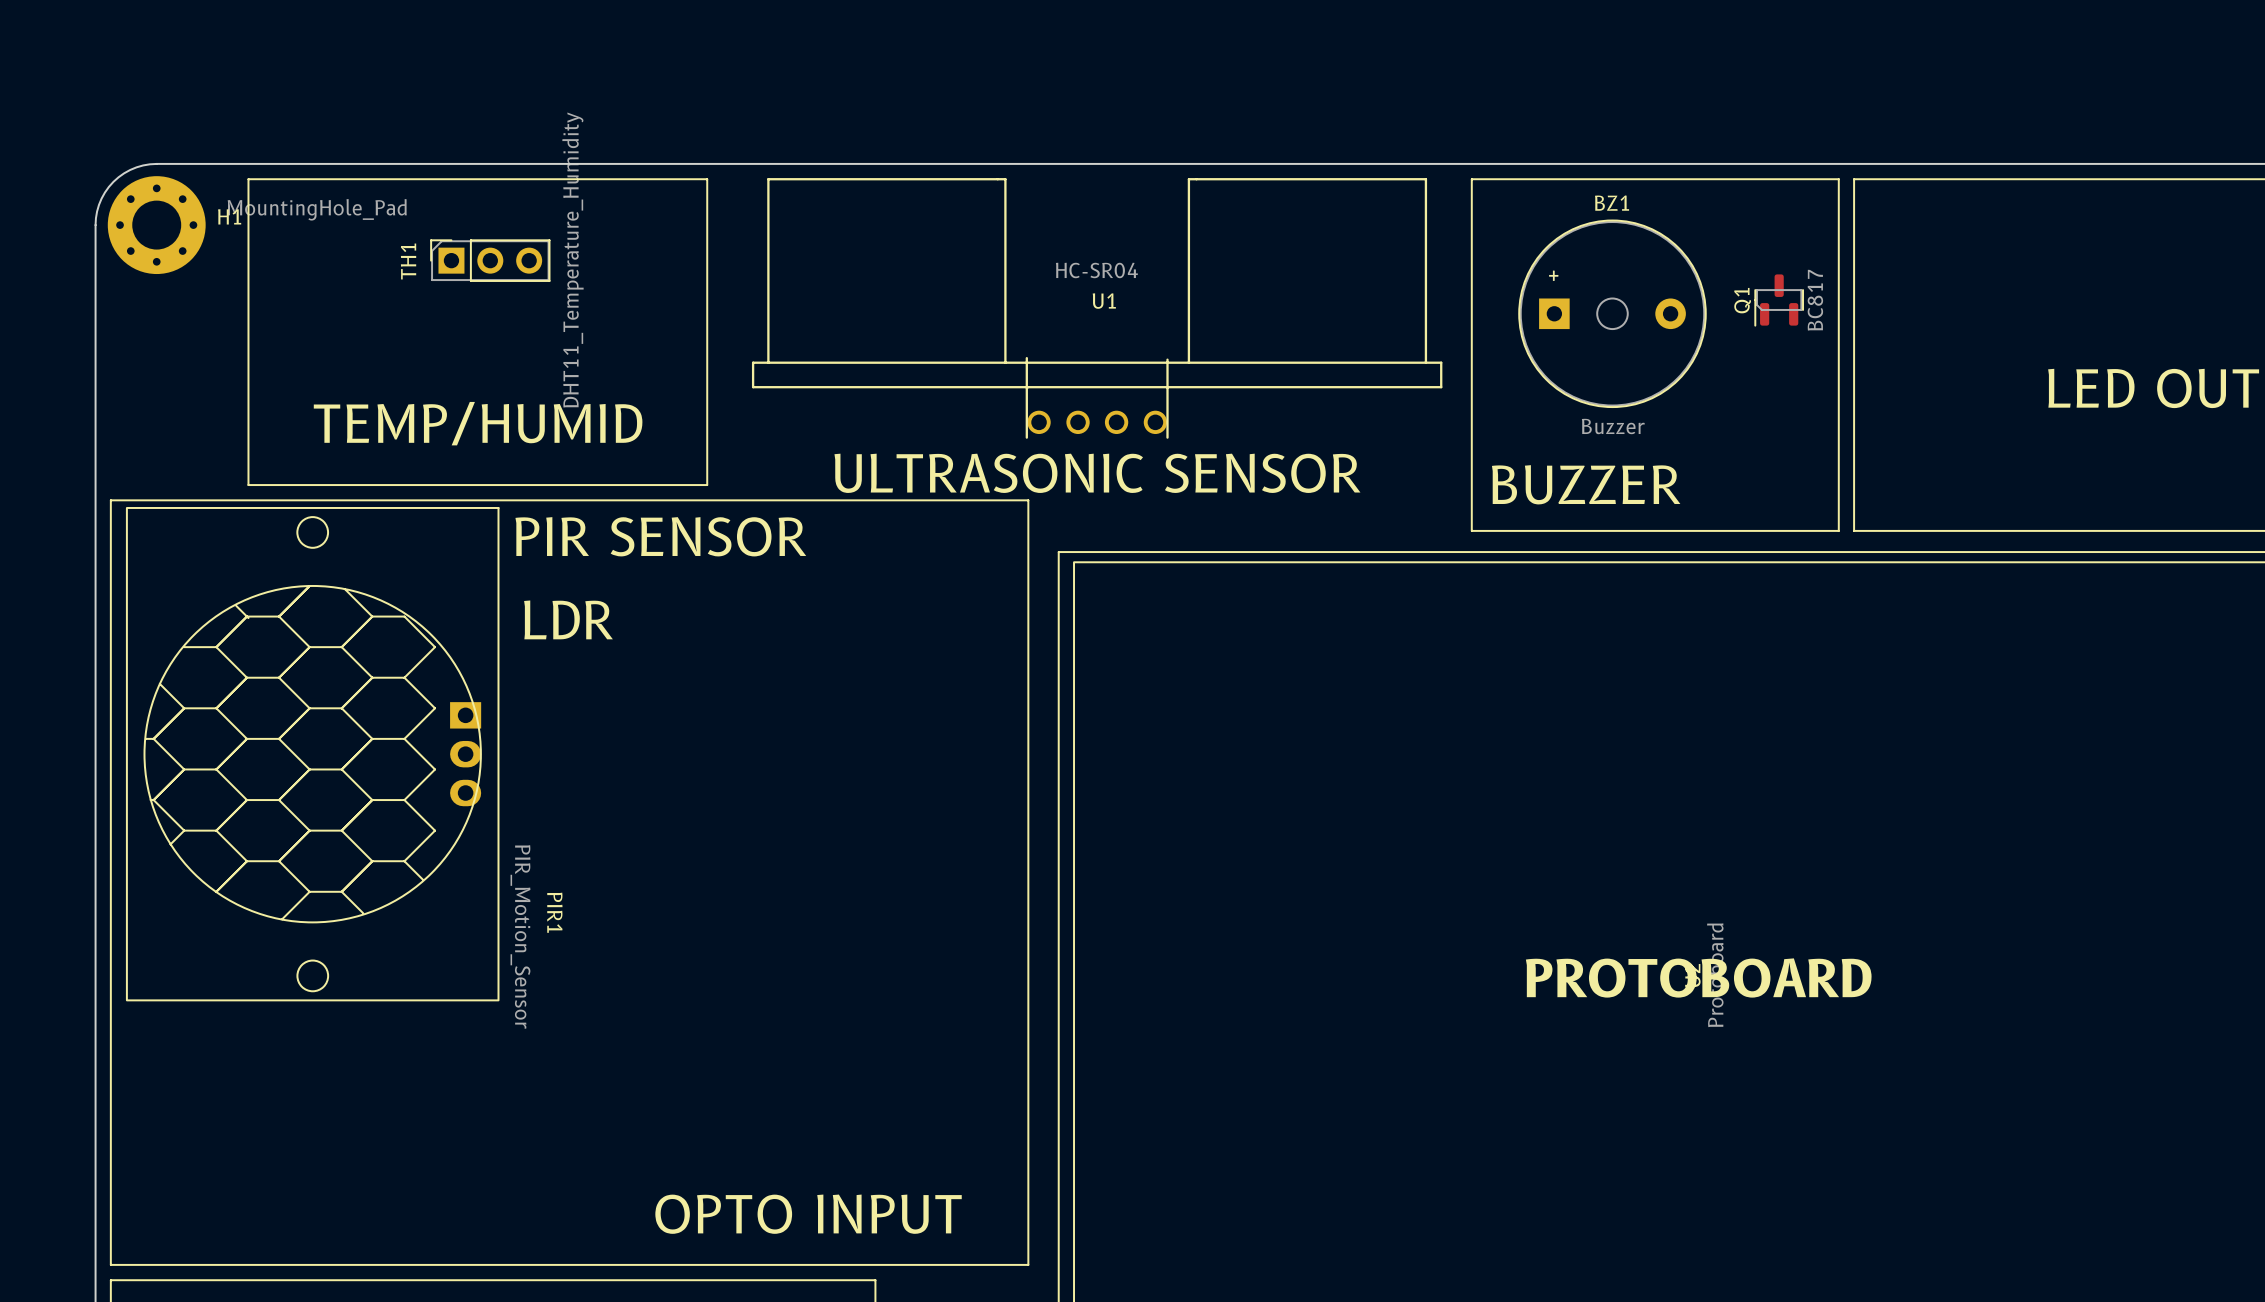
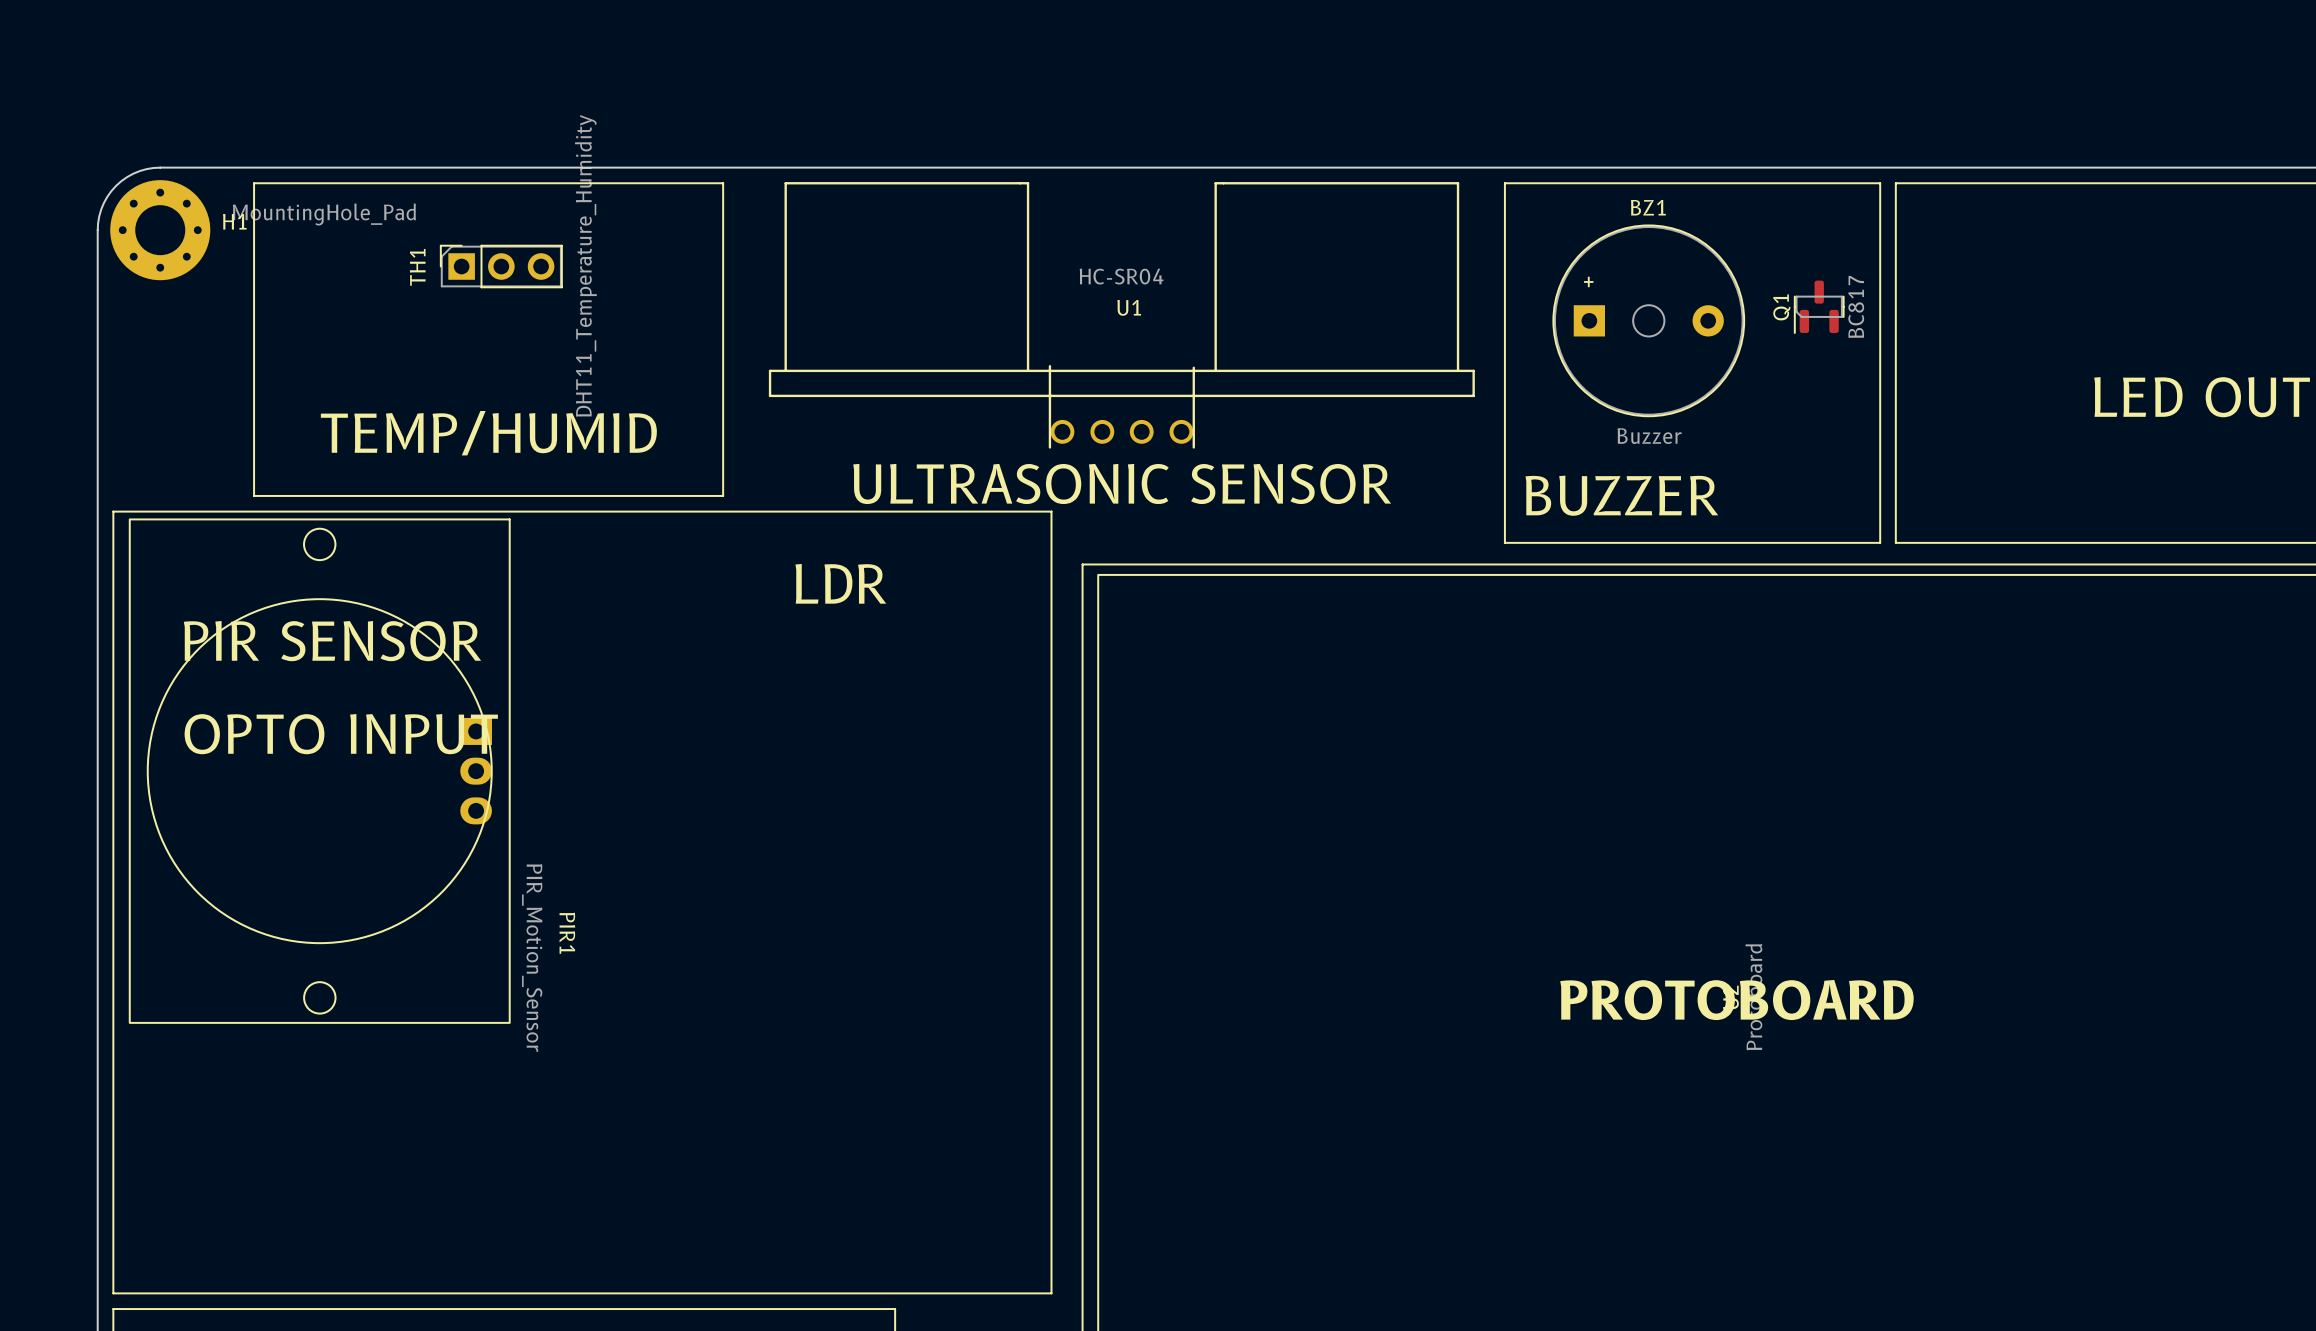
PIR1 footprint: [125, 507, 500, 1002] -> [128, 518, 511, 1024]
text position: PIR SENSOR (660, 536) -> PIR SENSOR (332, 641)
text position: LDR (568, 619) -> LDR (840, 583)
text: none -> OPTO INPUT (341, 734)
text: OPTO INPUT (808, 1214) -> none

